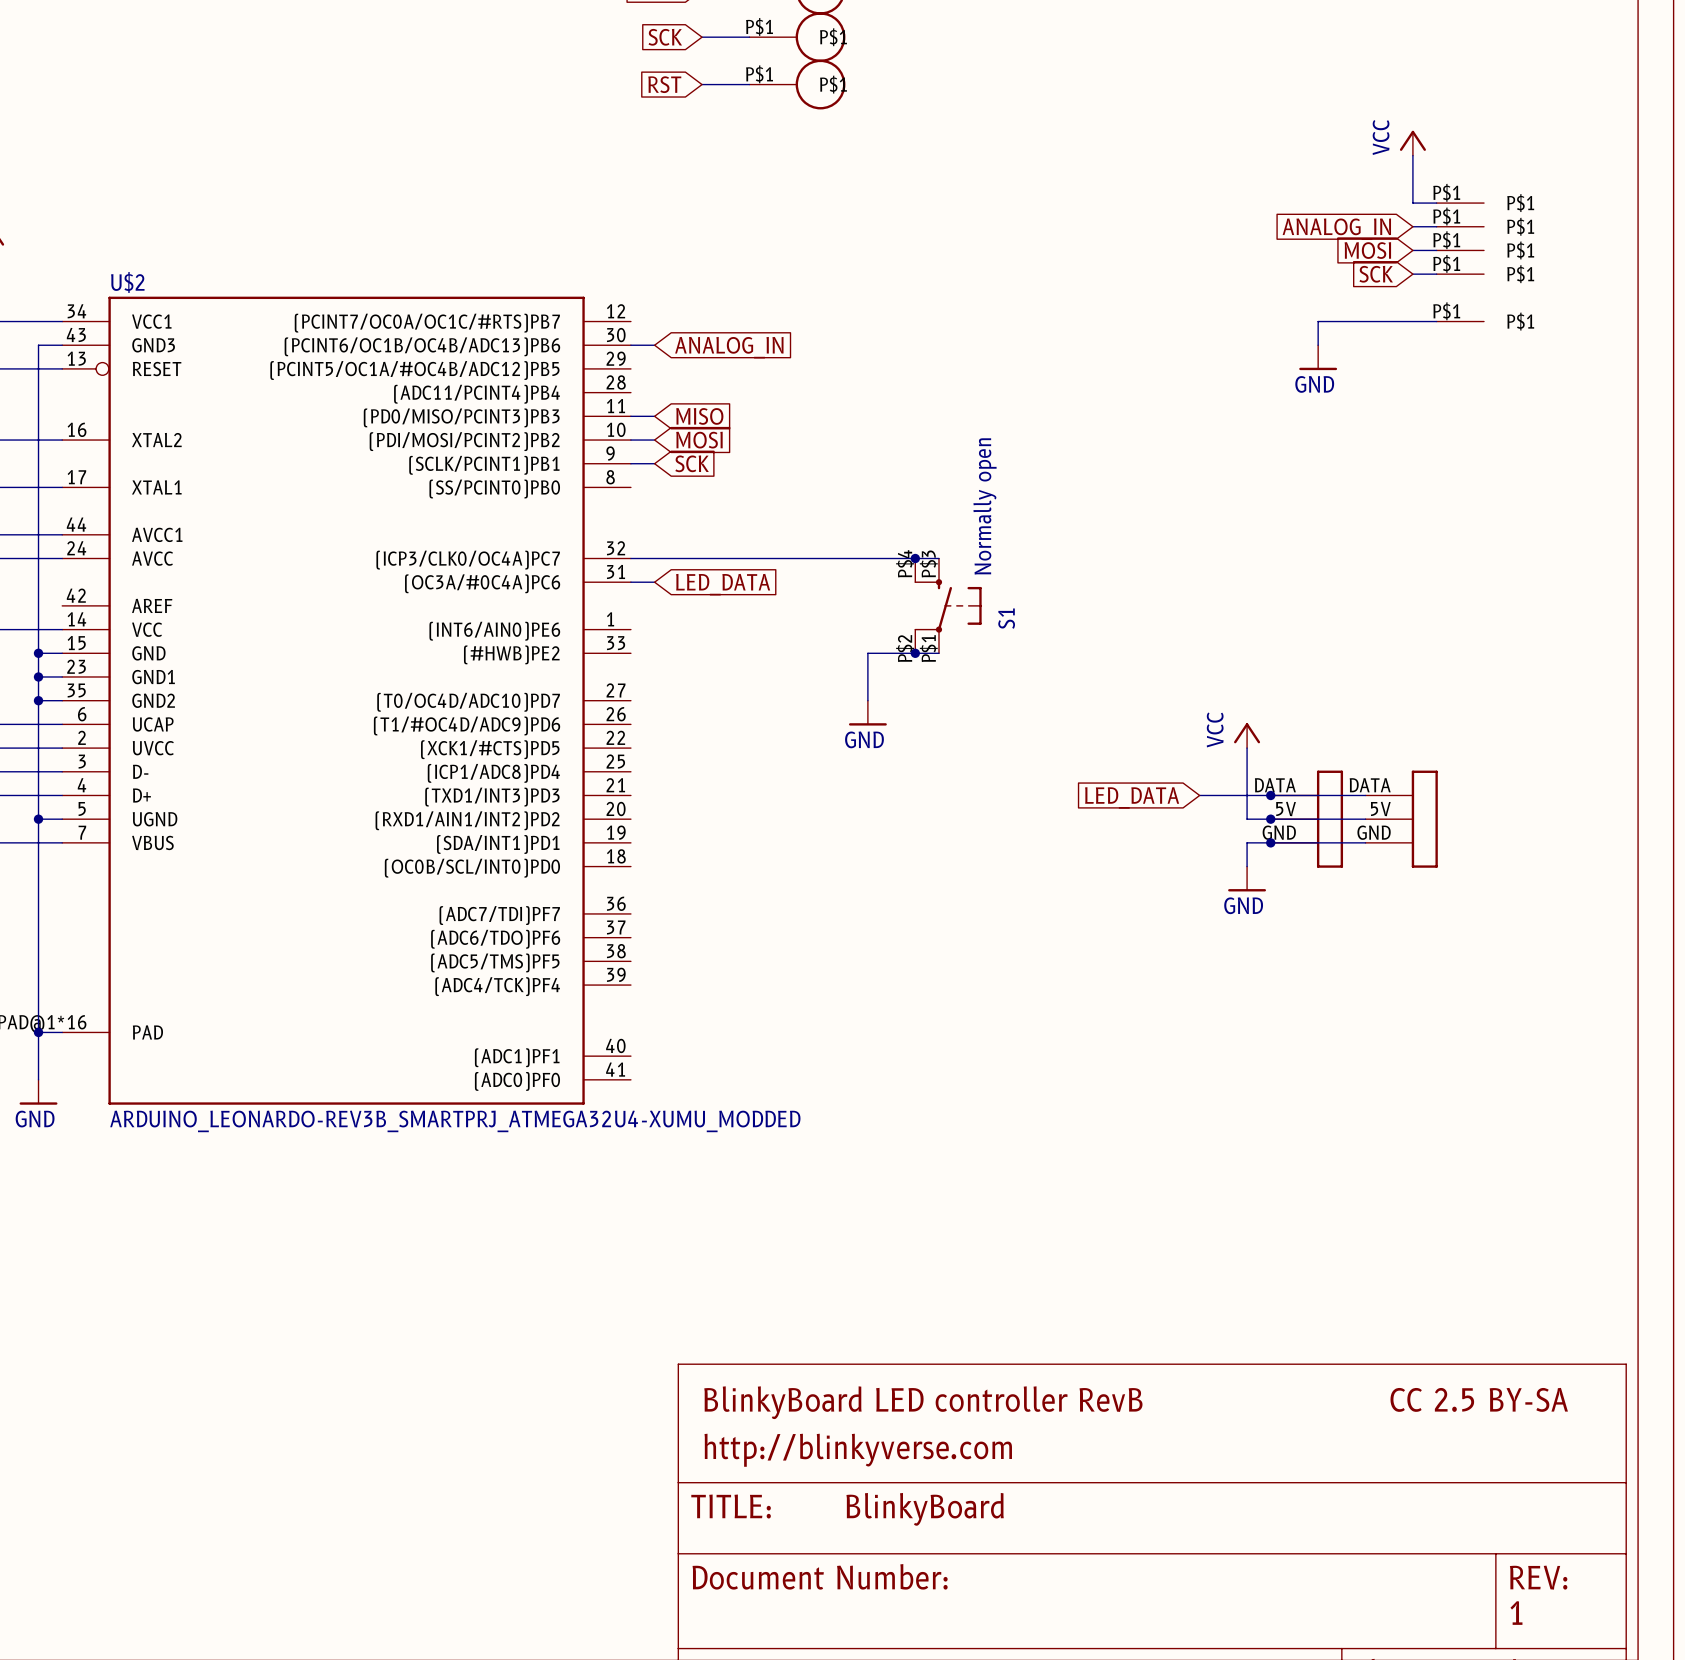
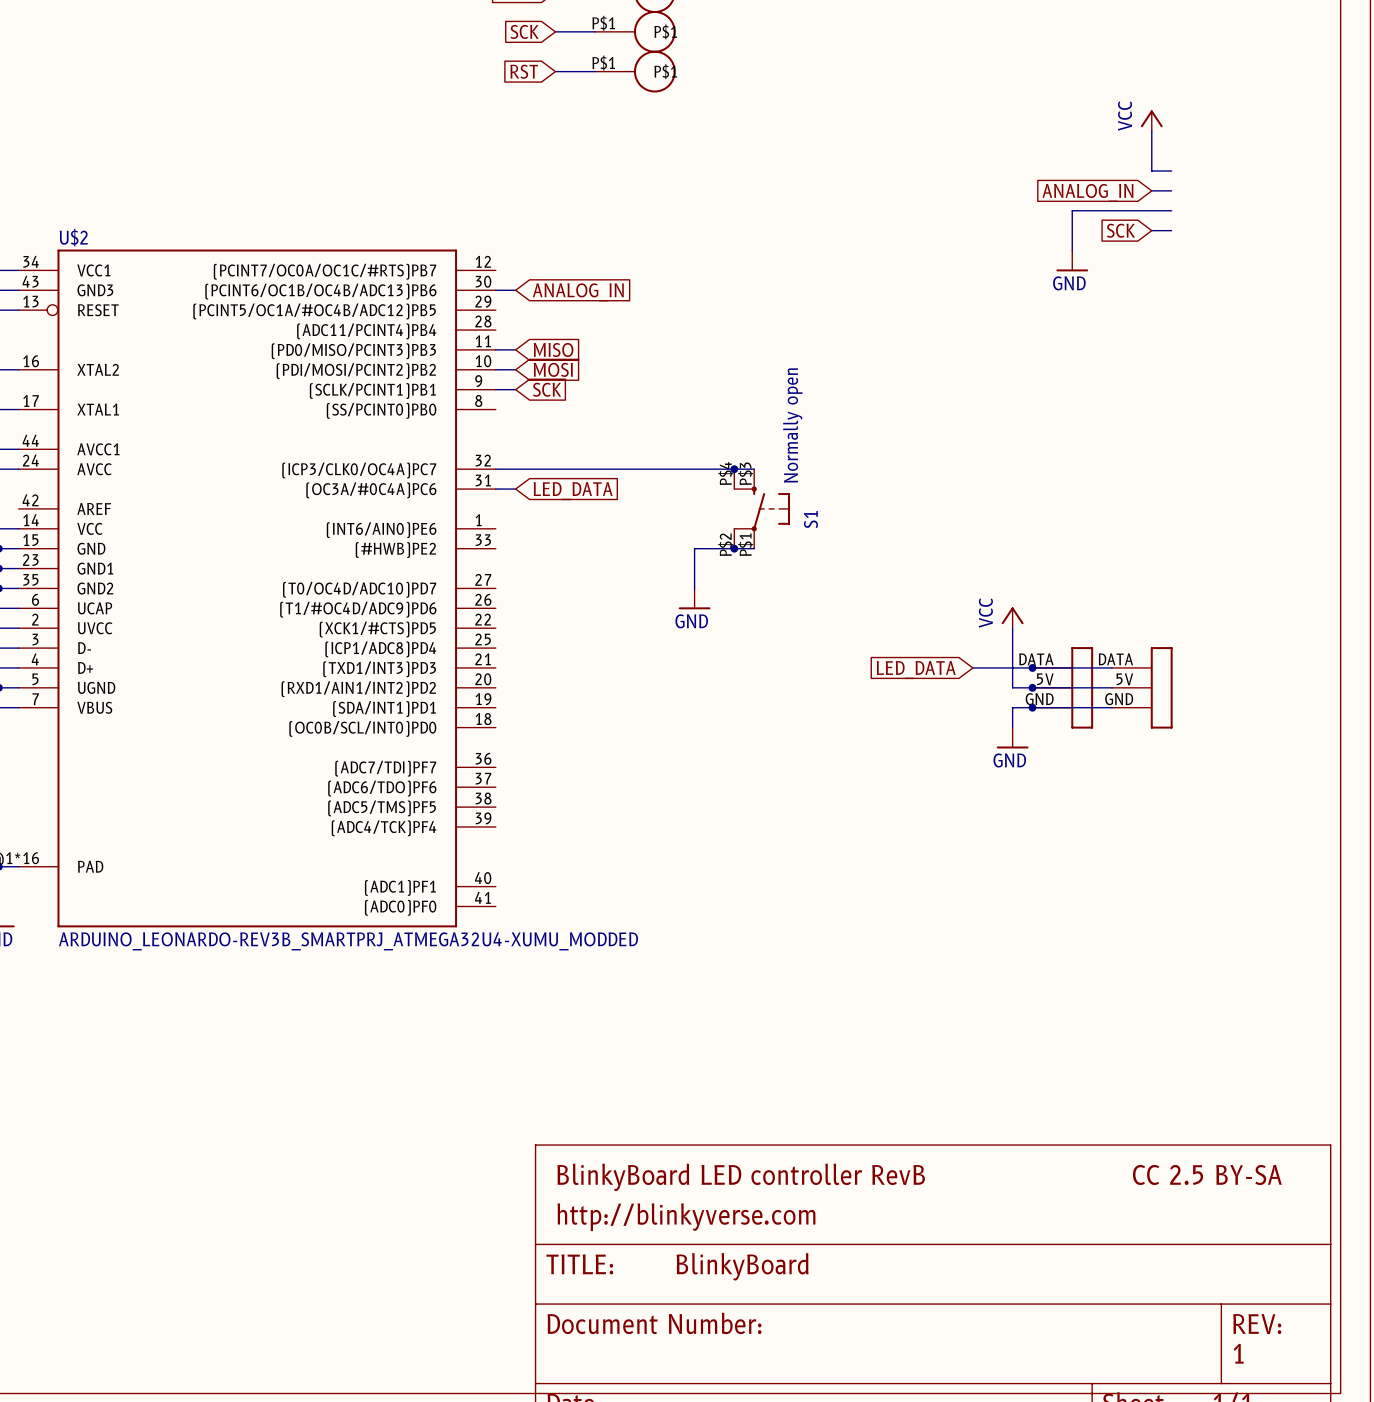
part: (1460, 203) -> none
part: (1460, 226) -> none
global label: MOSI (1367, 250) -> none
wire: none -> (1151, 210) (1072, 210) (1072, 250)
part: (1460, 250) -> none
part: (1460, 274) -> none
wire: (1436, 321) (1318, 321) (1318, 345) -> none
part: (1460, 321) -> none
power symbol position: GND (1318, 357) -> GND (1072, 260)

